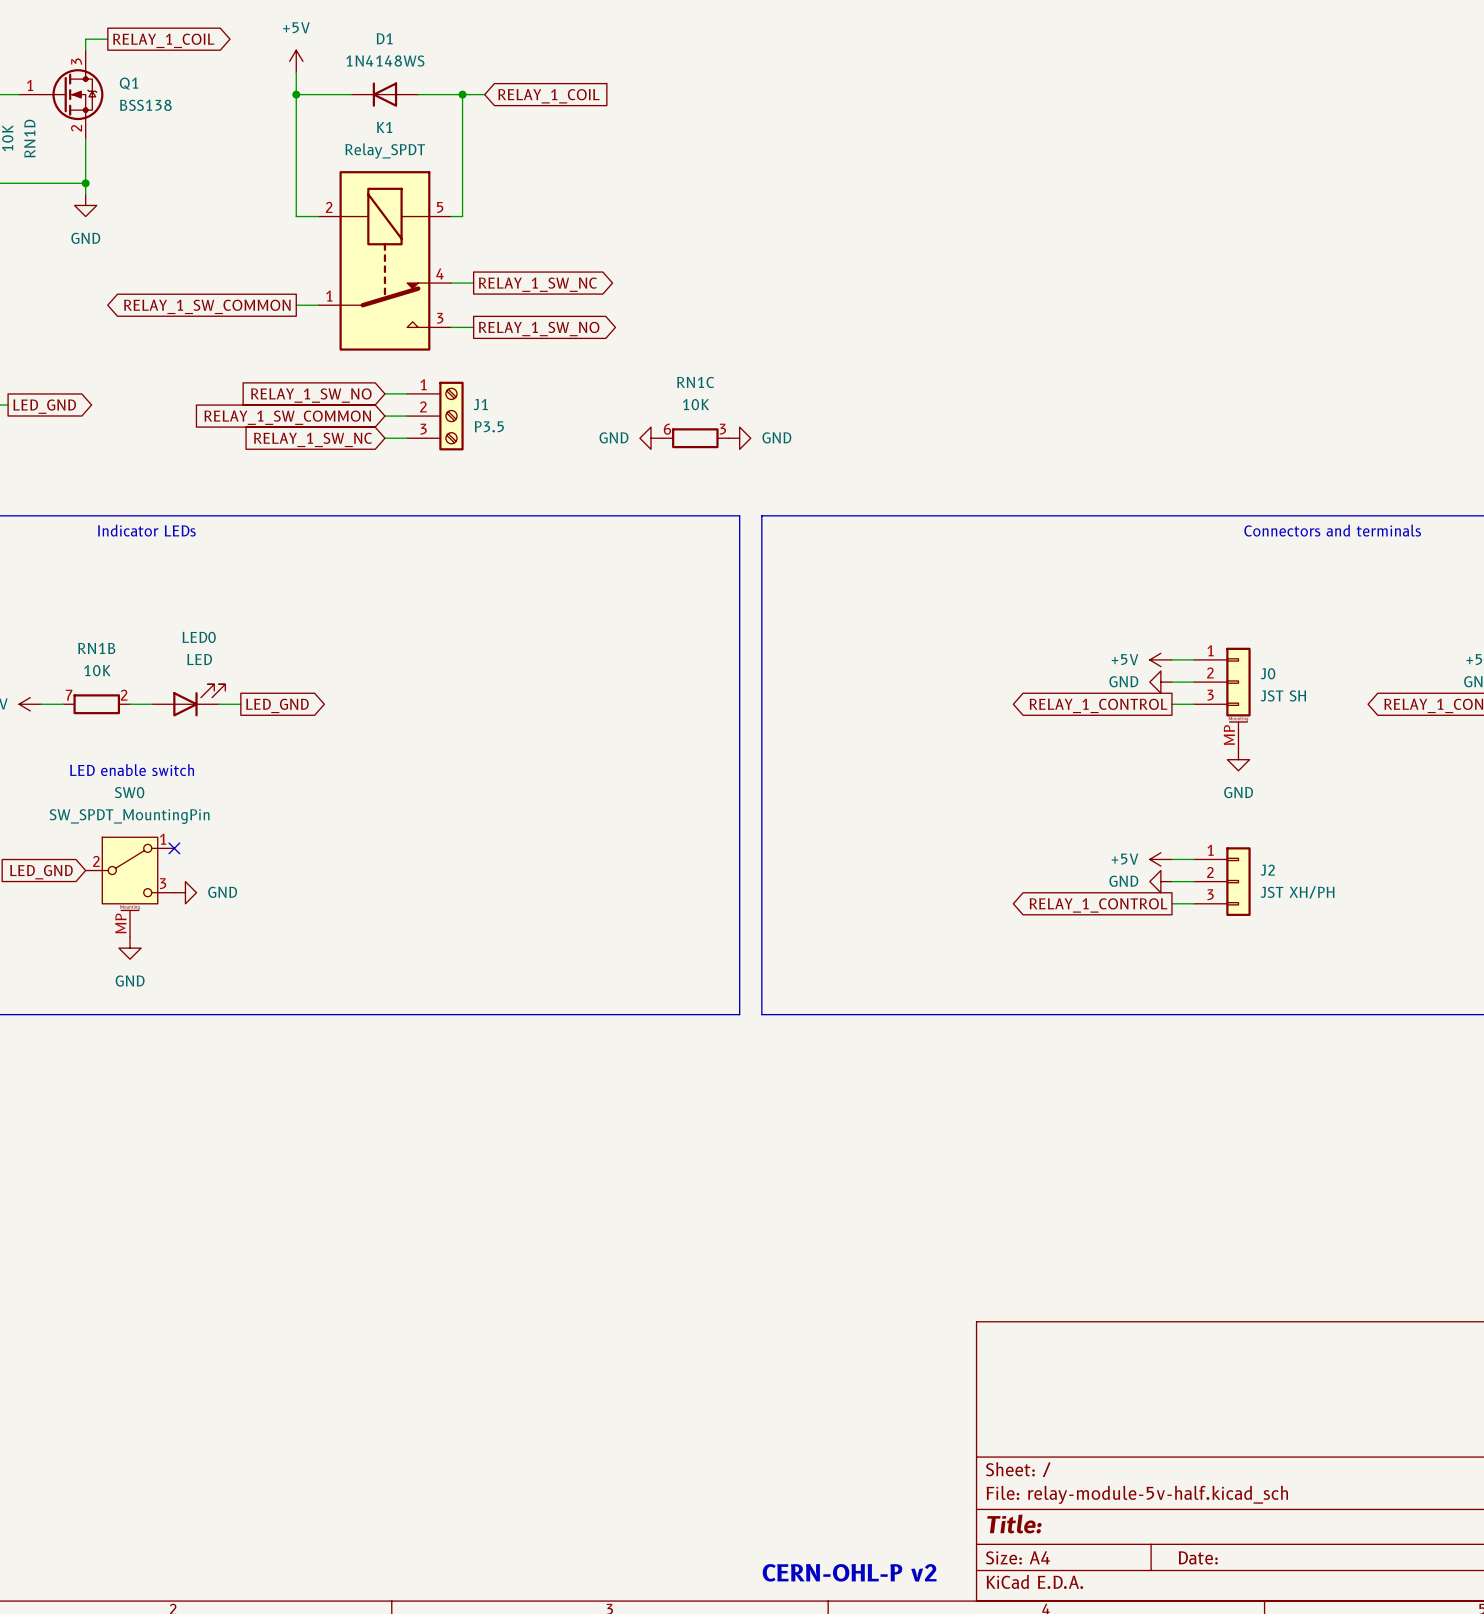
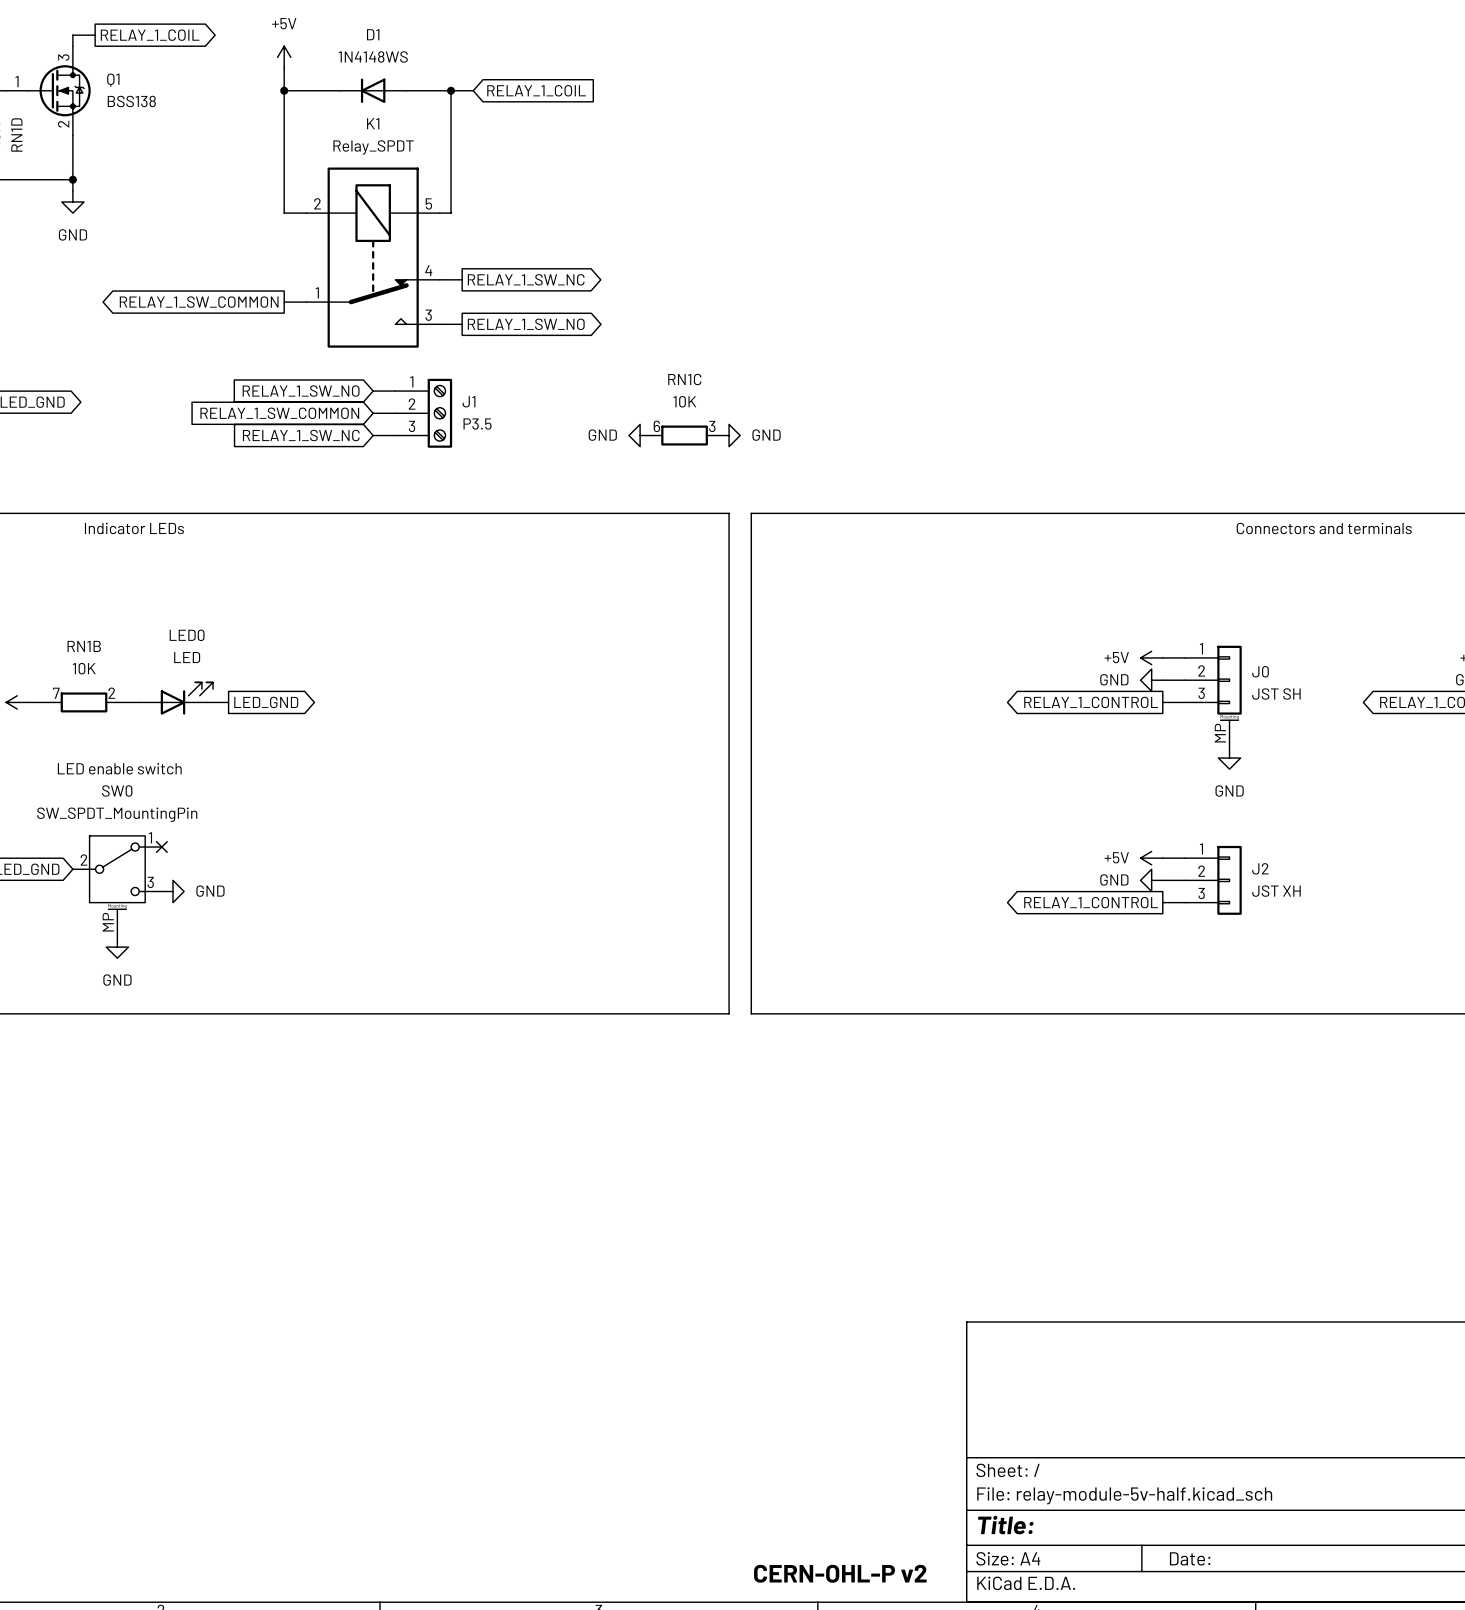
J2 value: JST XH/PH (1297, 892) -> JST XH (1276, 891)

